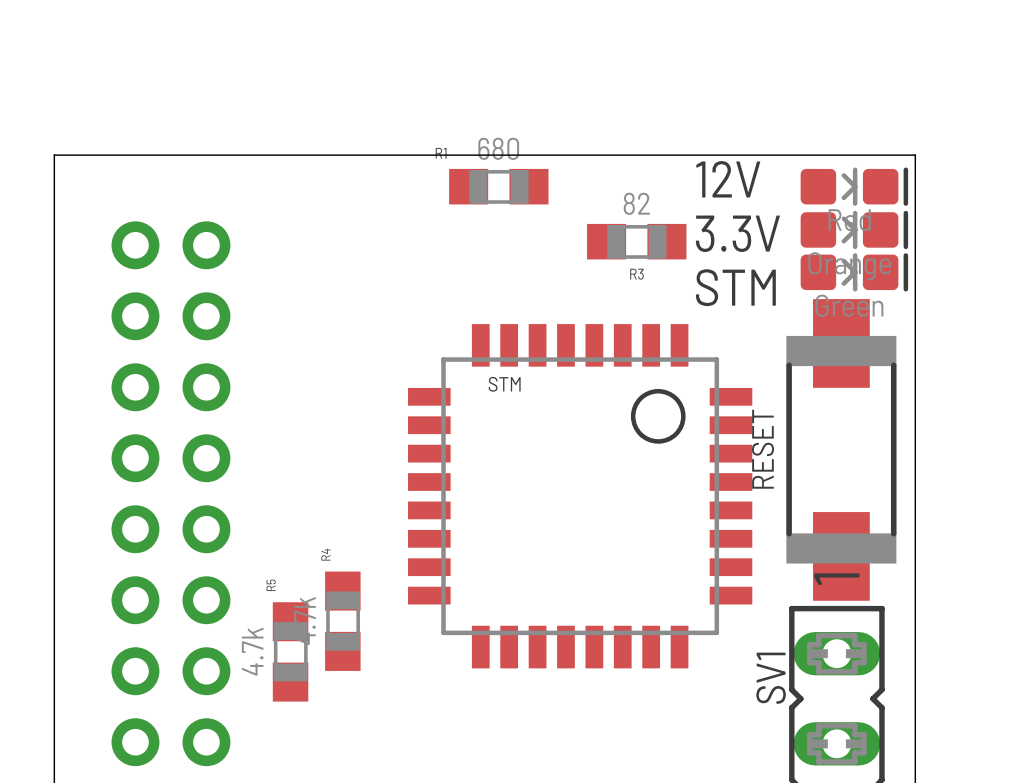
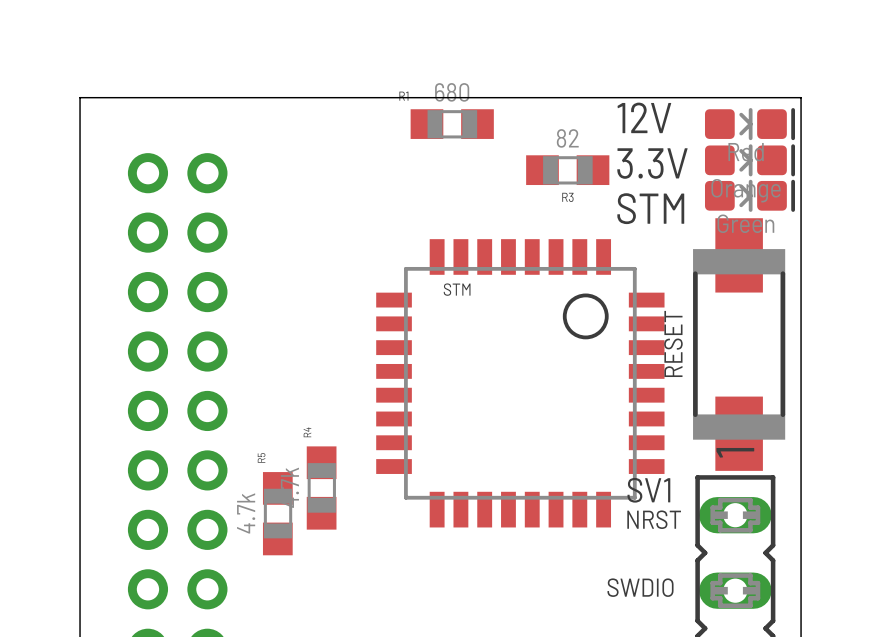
text: none -> NRST (654, 519)
SV1 name rotation: 0° (771, 678) -> 90° clockwise (648, 490)
text: none -> SWDIO (640, 587)

